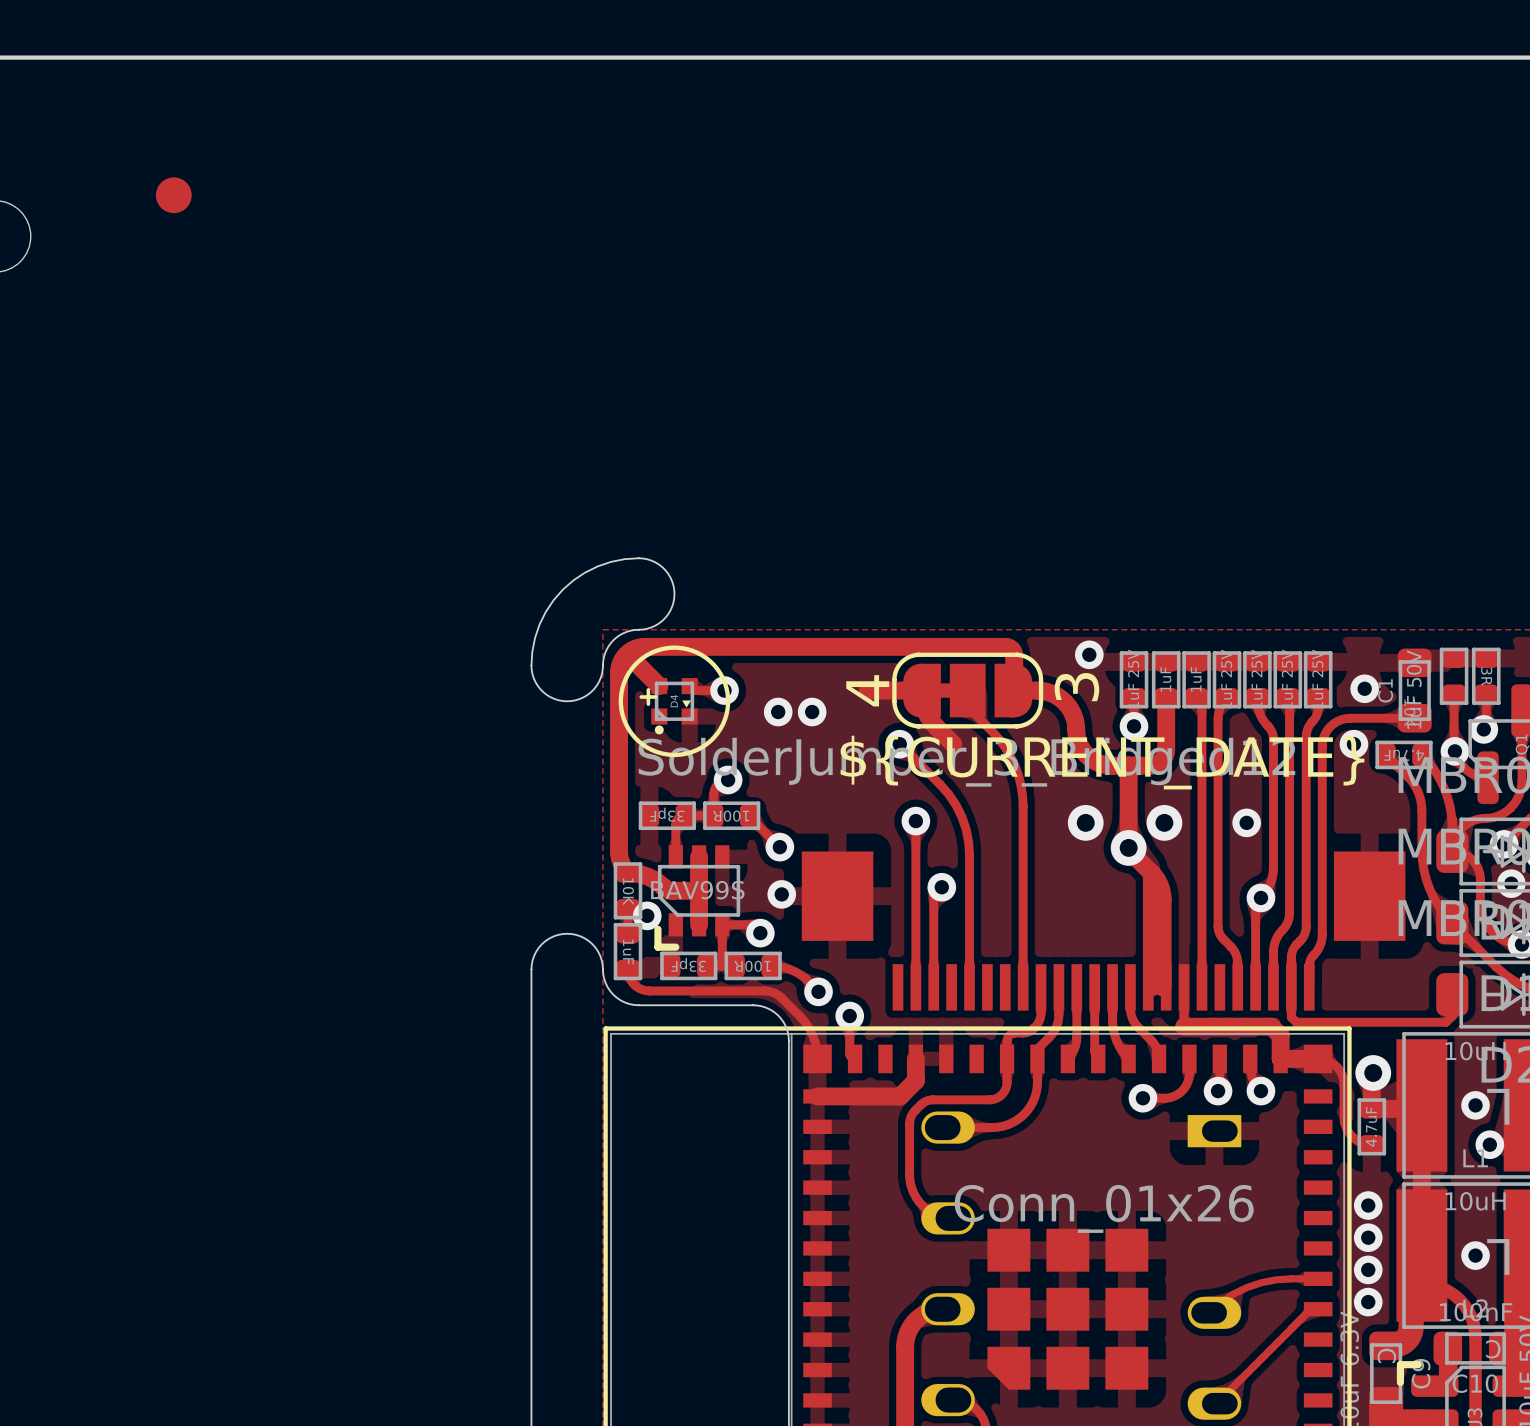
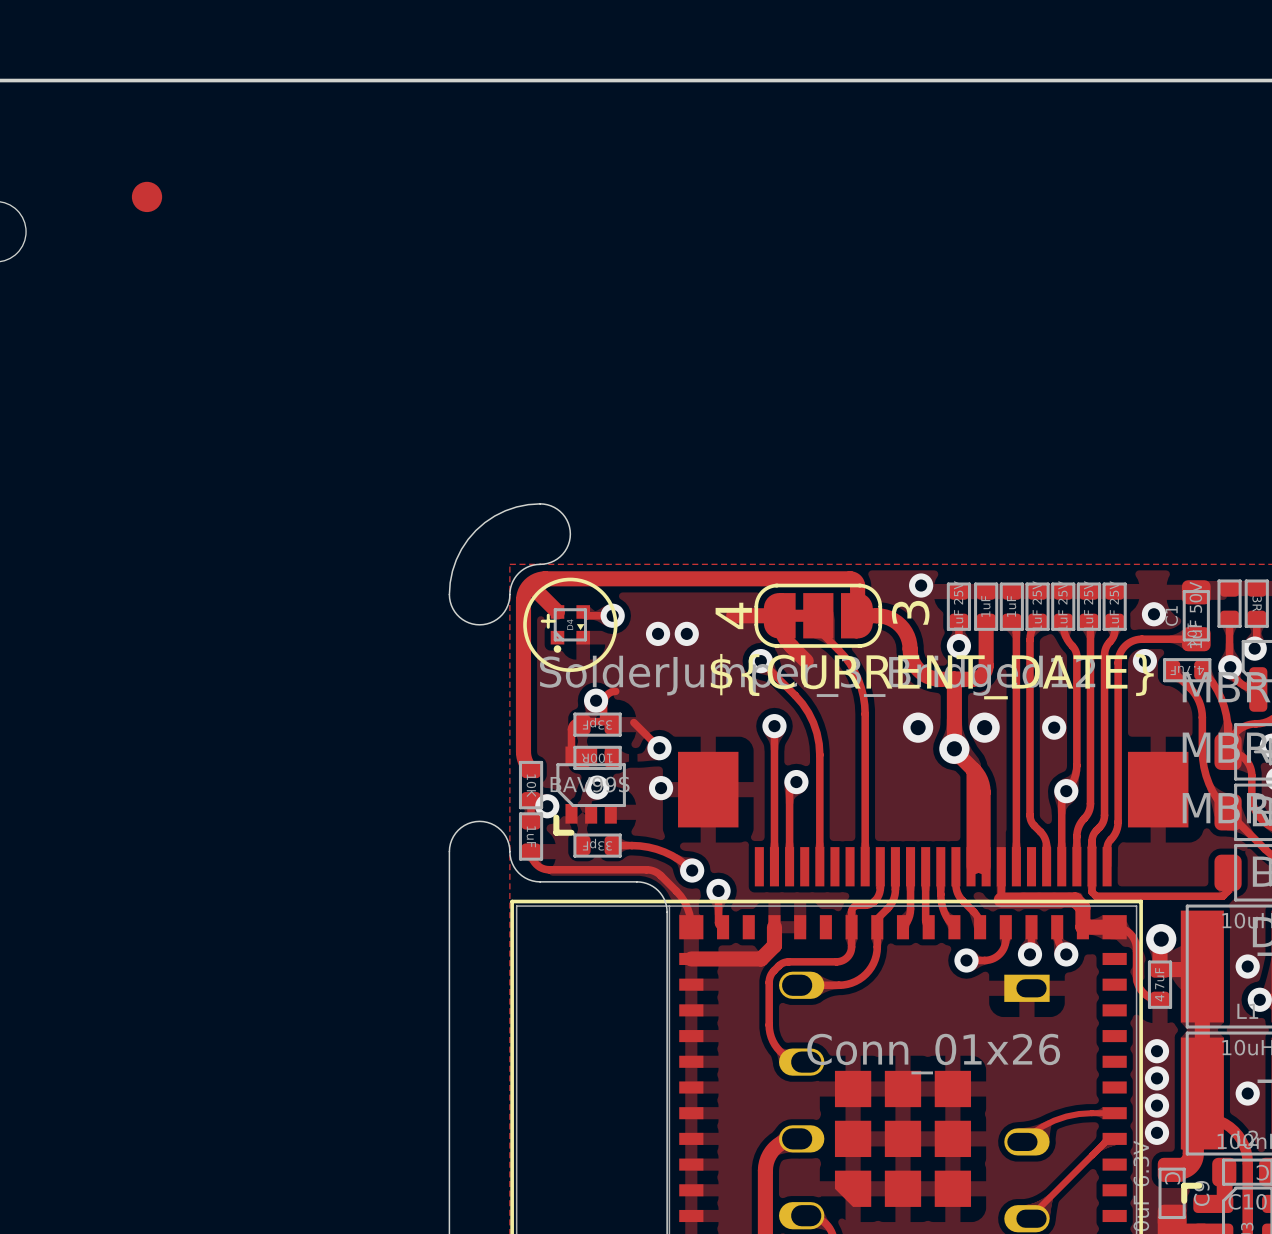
via position: (728, 779) -> (596, 700)
part position: (667, 815) -> (597, 724)
part position: (731, 815) -> (597, 757)
track: (699, 856) (699, 924) -> none
track: (629, 872) (647, 876) (668, 890) (699, 890) -> none
via: none -> (597, 787)
track: (760, 933) (752, 924) (722, 924) (720, 965) -> none
via: (760, 933) -> none
part position: (688, 965) -> (597, 845)
part: 100R (753, 965) -> none
track: (771, 965) (795, 971) (818, 991) -> (612, 845) (640, 845) (656, 849) (679, 859) (692, 870)

